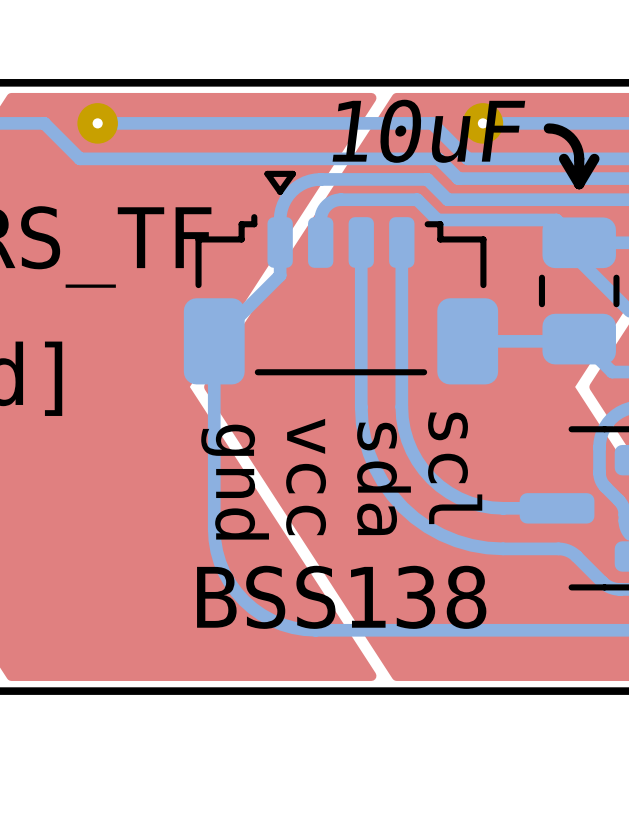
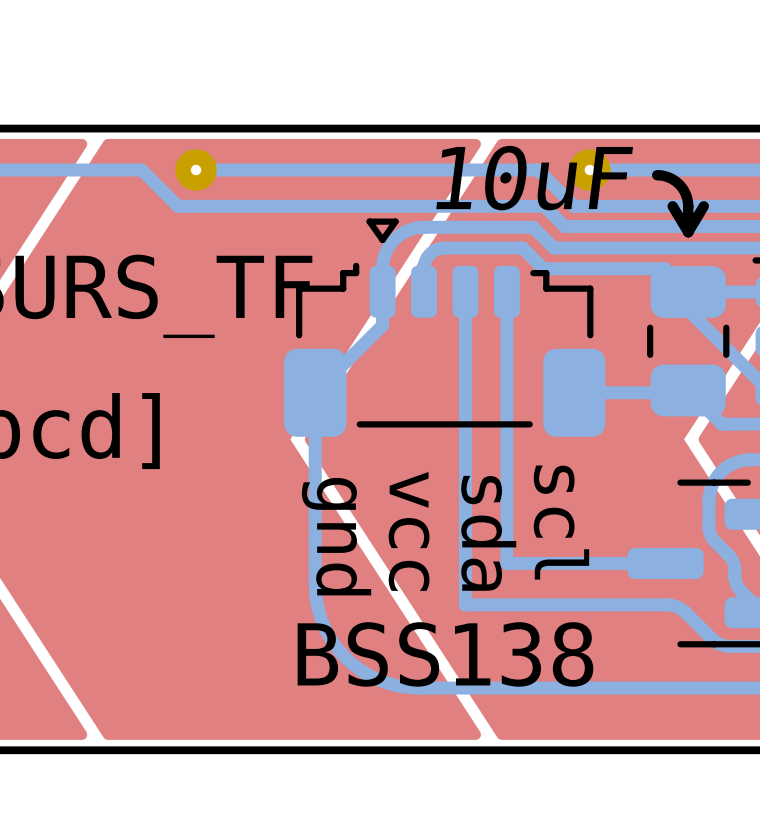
bottom track: (361, 406) (364, 438) (369, 453) (383, 482) (402, 507) (427, 527) (456, 540) (487, 547) (503, 548) -> (465, 459) (465, 604) (610, 604)
bottom track: (401, 406) (404, 429) (411, 450) (431, 478) (459, 498) (480, 505) (503, 508) -> (506, 459) (506, 563) (610, 563)

